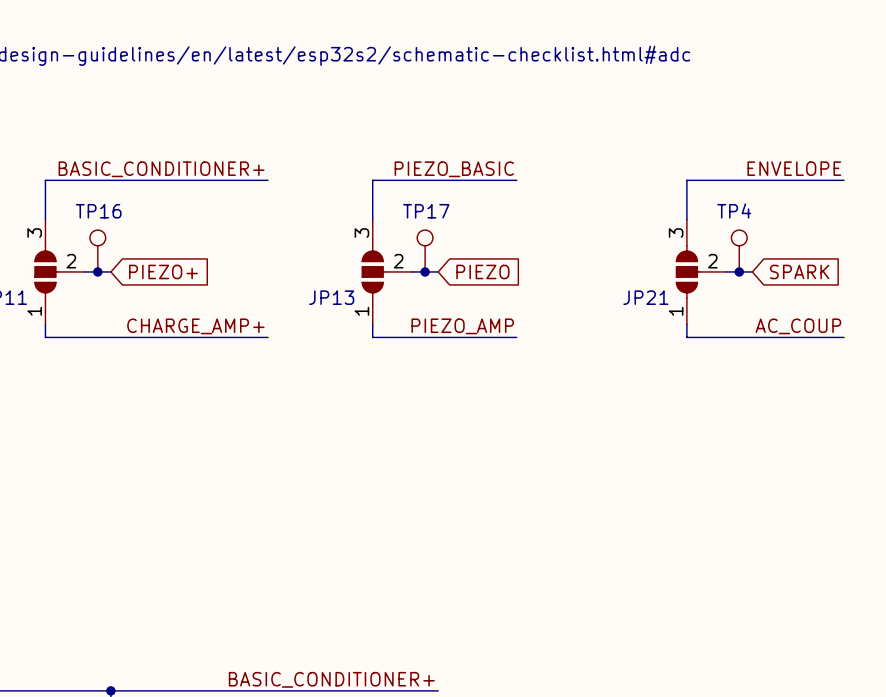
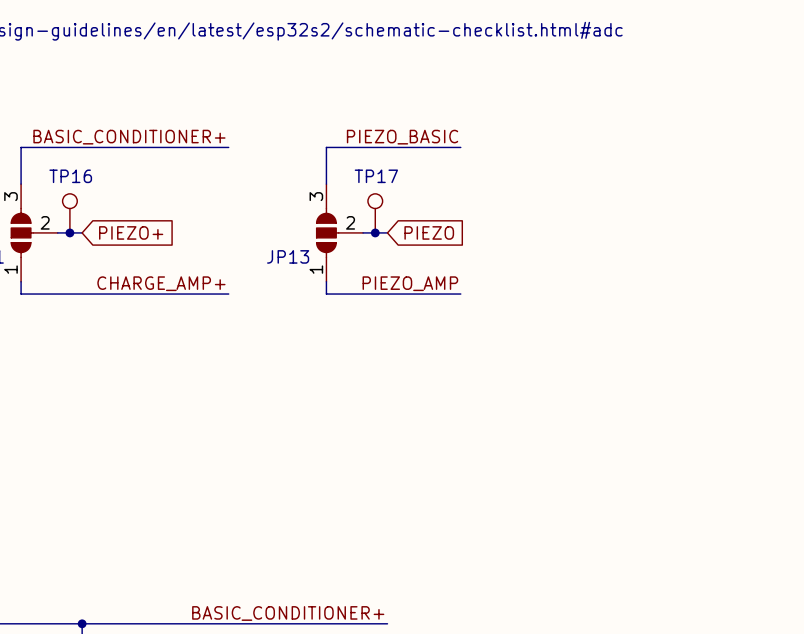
label: ENVELOPE (794, 168) -> none
wire: (844, 180) (686, 180) (686, 219) -> none
TP4: (739, 251) -> none
JP21: (701, 271) -> none
wire: (726, 271) (752, 271) -> none
junction: (739, 271) -> none
global label: SPARK (799, 271) -> none
wire: (686, 324) (686, 337) (844, 337) -> none
label: AC_COUP (798, 326) -> none

